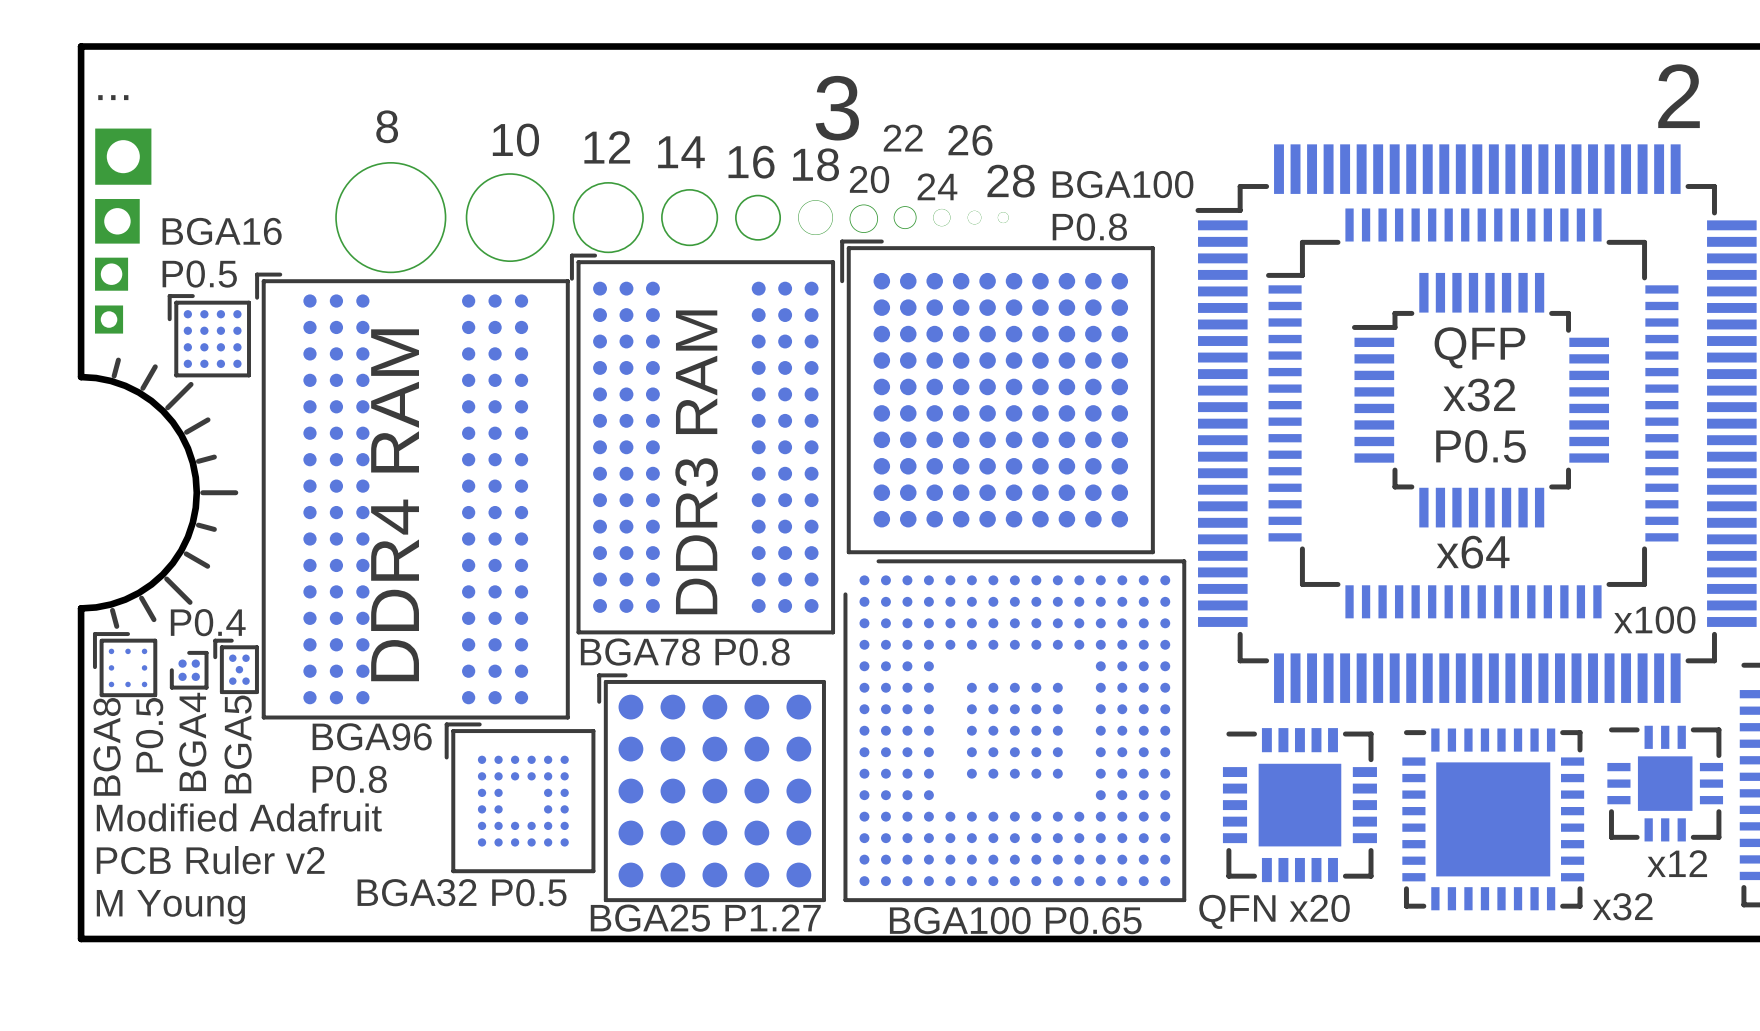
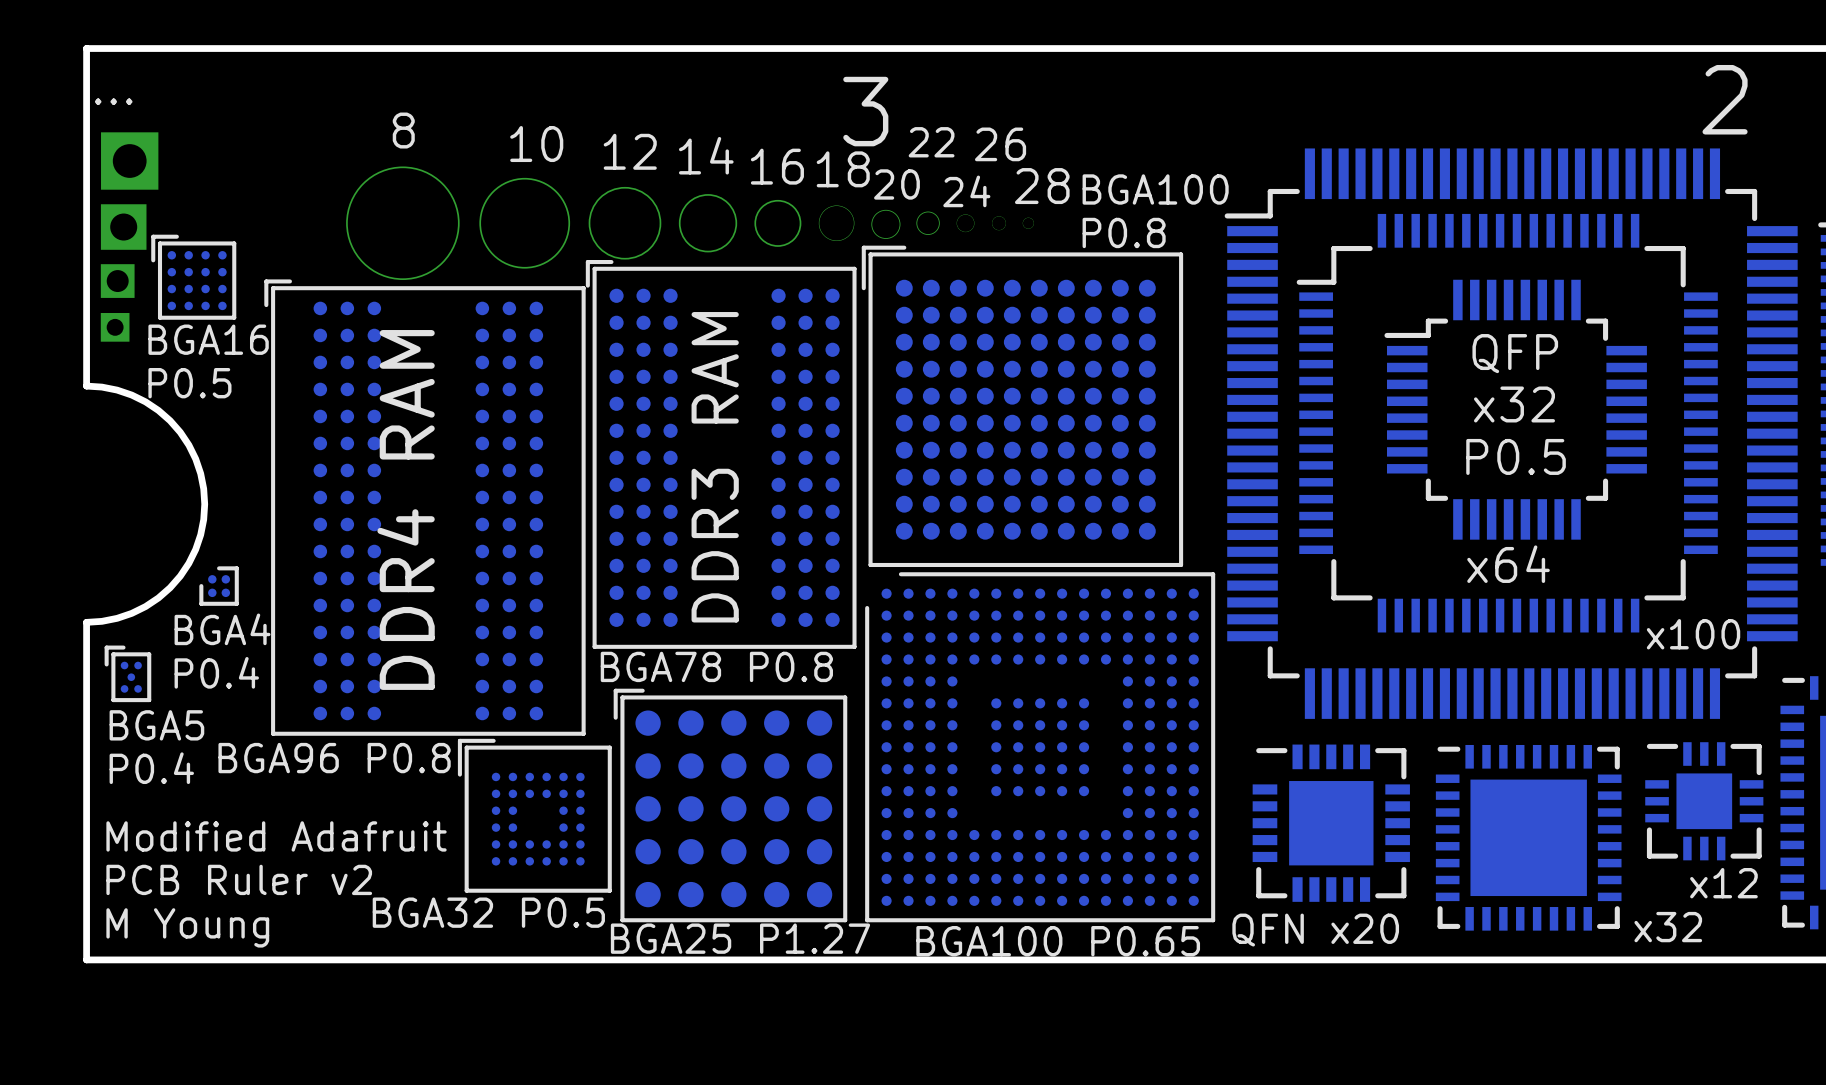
text position: BGA16 (222, 231) -> BGA16 (208, 339)
text position: P0.5 (199, 274) -> P0.5 (189, 383)
part position: (209, 335) -> (193, 277)
line: (118, 360) (114, 376) -> none
line: (155, 366) (142, 388) -> none
line: (191, 384) (167, 407) -> none
line: (208, 419) (186, 432) -> none
line: (214, 457) (198, 461) -> none
line: (235, 492) (202, 492) -> none
line: (198, 525) (214, 529) -> none
line: (186, 553) (207, 566) -> none
line: (166, 579) (190, 602) -> none
line: (141, 598) (153, 619) -> none
line: (112, 610) (116, 626) -> none
text position: P0.4 (208, 622) -> P0.4 (216, 672)
part footprint: [92, 632, 158, 698] -> [104, 645, 152, 703]
part: (236, 666) -> none
part position: (189, 670) -> (219, 586)
text: P0.5 (149, 735) -> P0.4 (151, 768)
text: BGA96 (372, 736) -> BGA96 P0.8 (334, 758)
text rotation: 0° (192, 741) -> 90° clockwise (222, 629)
text rotation: 0° (238, 744) -> 90° clockwise (156, 725)
text: BGA8 (107, 746) -> none
text: P0.8 (349, 779) -> none

